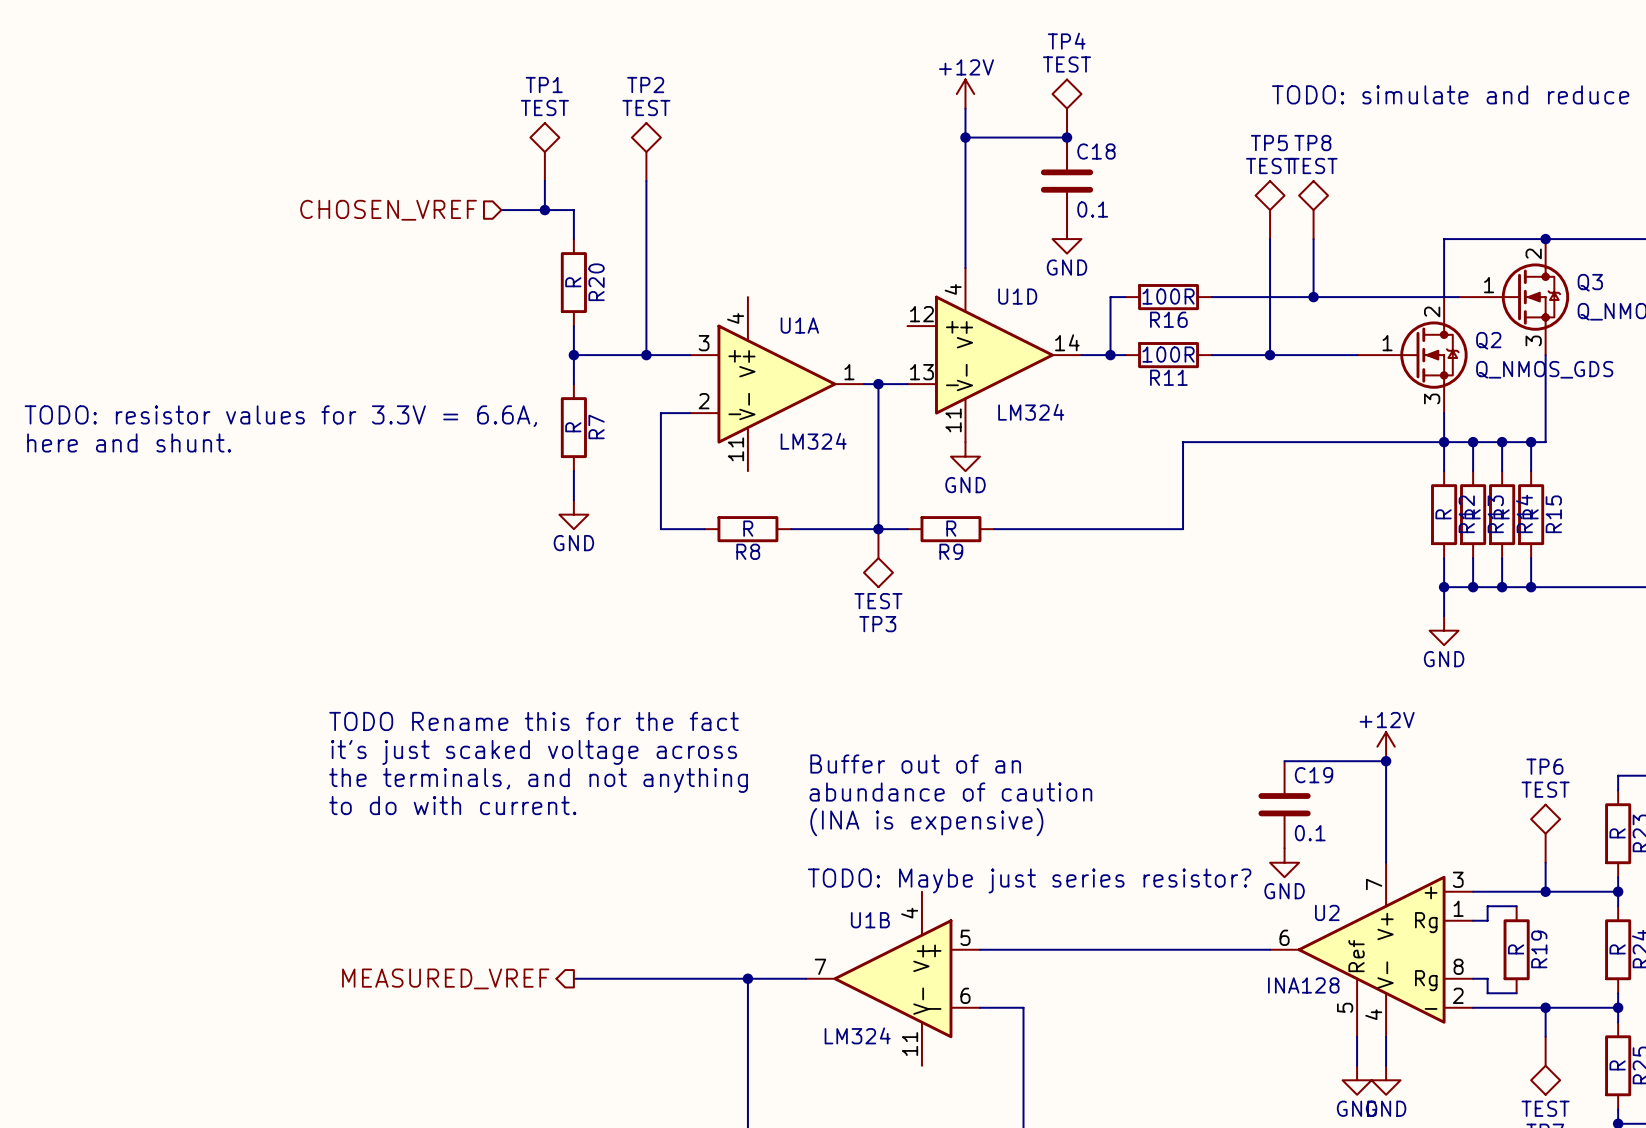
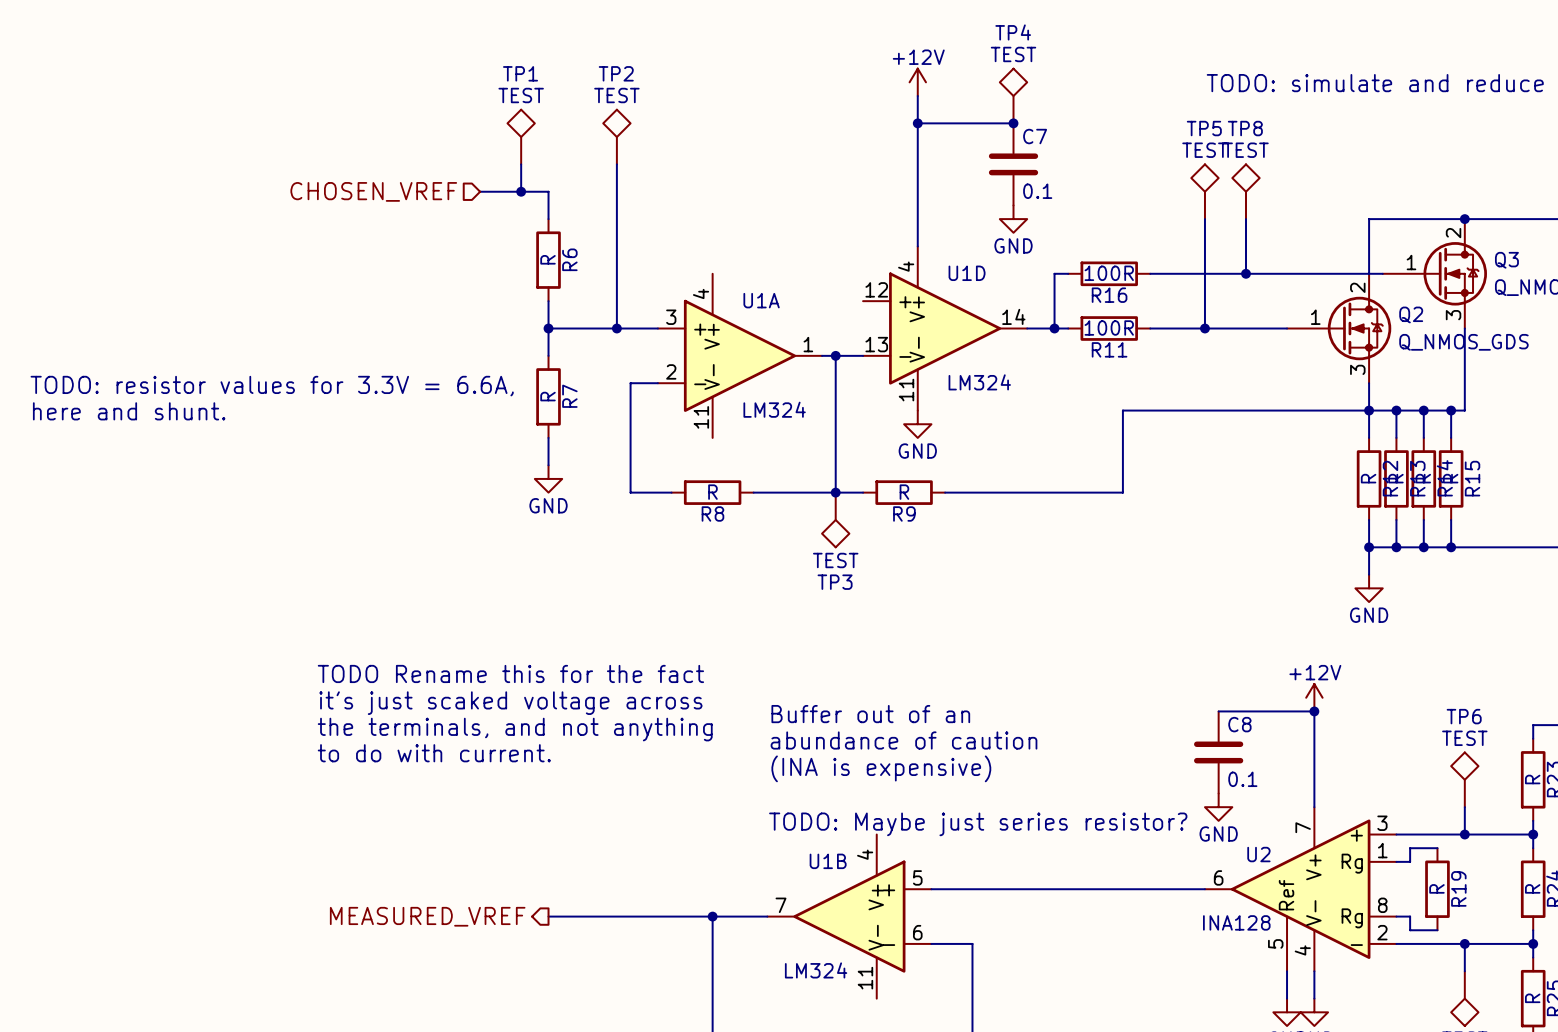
C18 name: C18 (1096, 151) -> C7 (1035, 136)
R20 name: R20 (596, 282) -> R6 (569, 259)
C19 name: C19 (1314, 775) -> C8 (1239, 724)

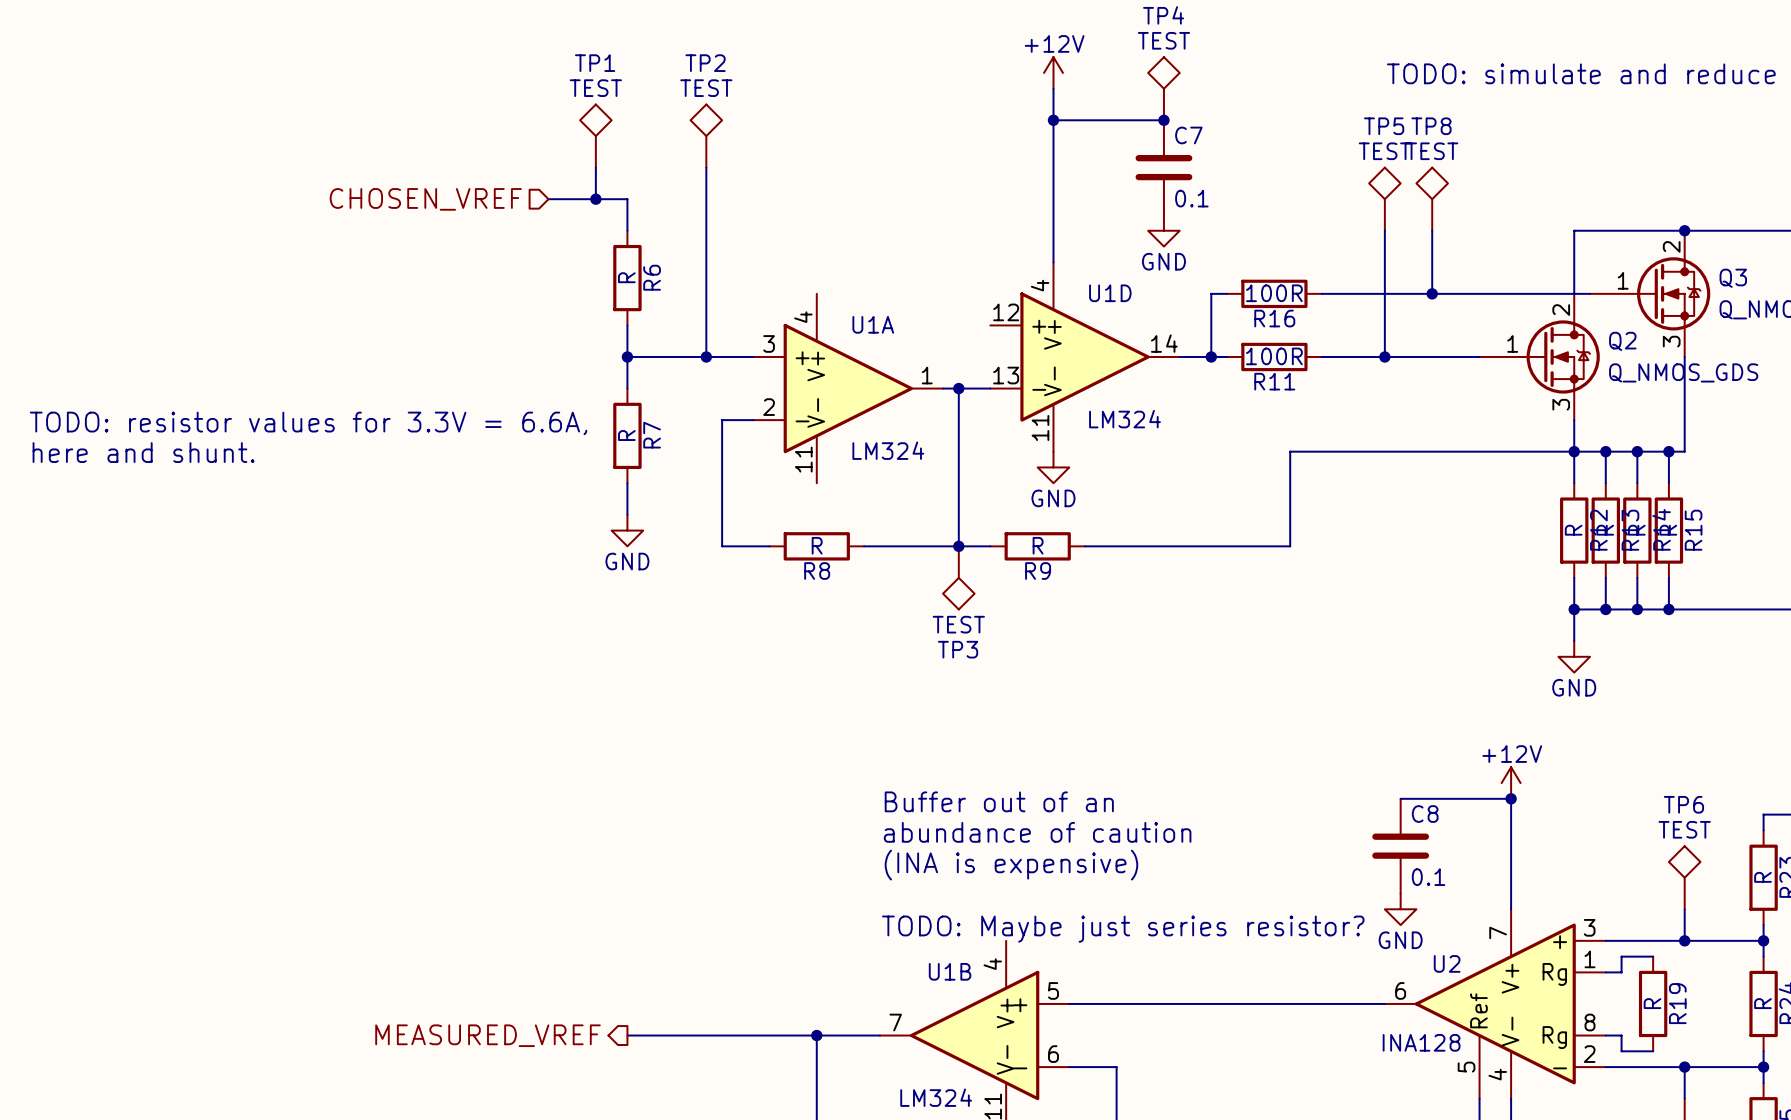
text: TODO Rename this for the fact (510, 673) -> none
text: it's just scaked voltage across (510, 703) -> none
text: the terminals, and not anything (515, 729) -> none
text: to do with current. (434, 753) -> none

